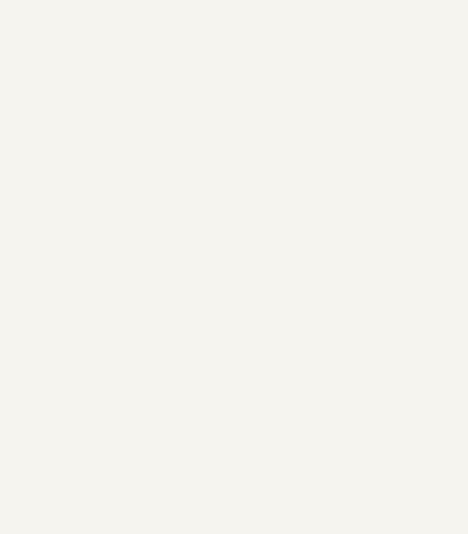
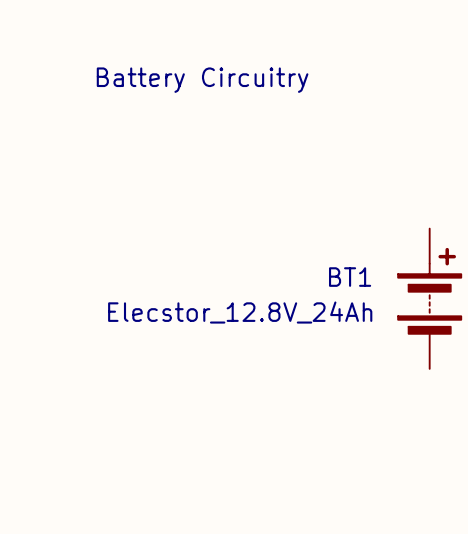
text: none -> Battery Circuitry (202, 80)
BT1: none -> Elecstor_12.8V_24Ah (429, 298)

